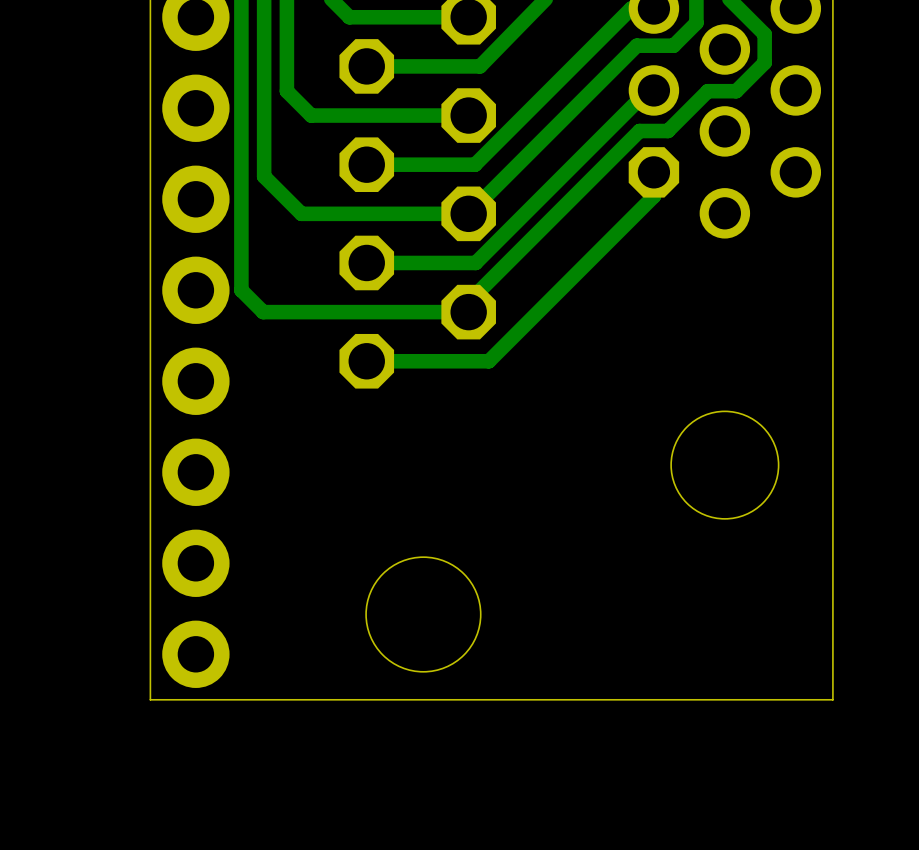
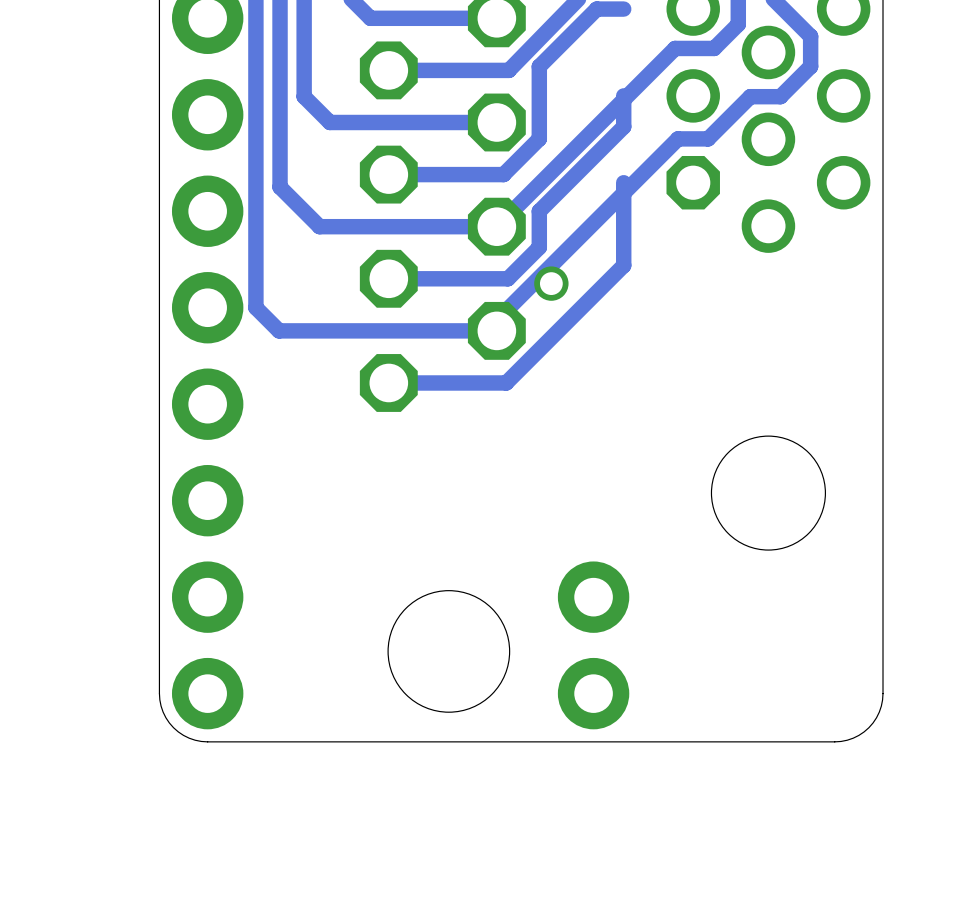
track: (653, 8) (631, 8) (508, 131) -> (623, 9) (596, 9) (539, 66) (539, 138)
track: (653, 90) (648, 90) (475, 262) -> (623, 95) (623, 126) (539, 211) (539, 247) (507, 278) (504, 278)
track: (653, 172) (653, 196) (488, 361) (477, 361) -> (623, 182) (623, 265) (506, 382)
via: none -> (551, 283)
part: none -> (593, 645)
board edge: (150, 654) (150, 699) (195, 699) -> (159, 693) (163, 712) (173, 727) (189, 738) (207, 741)
board edge: (832, 654) (832, 699) (787, 699) -> (883, 693) (879, 712) (868, 727) (853, 738) (834, 741)

